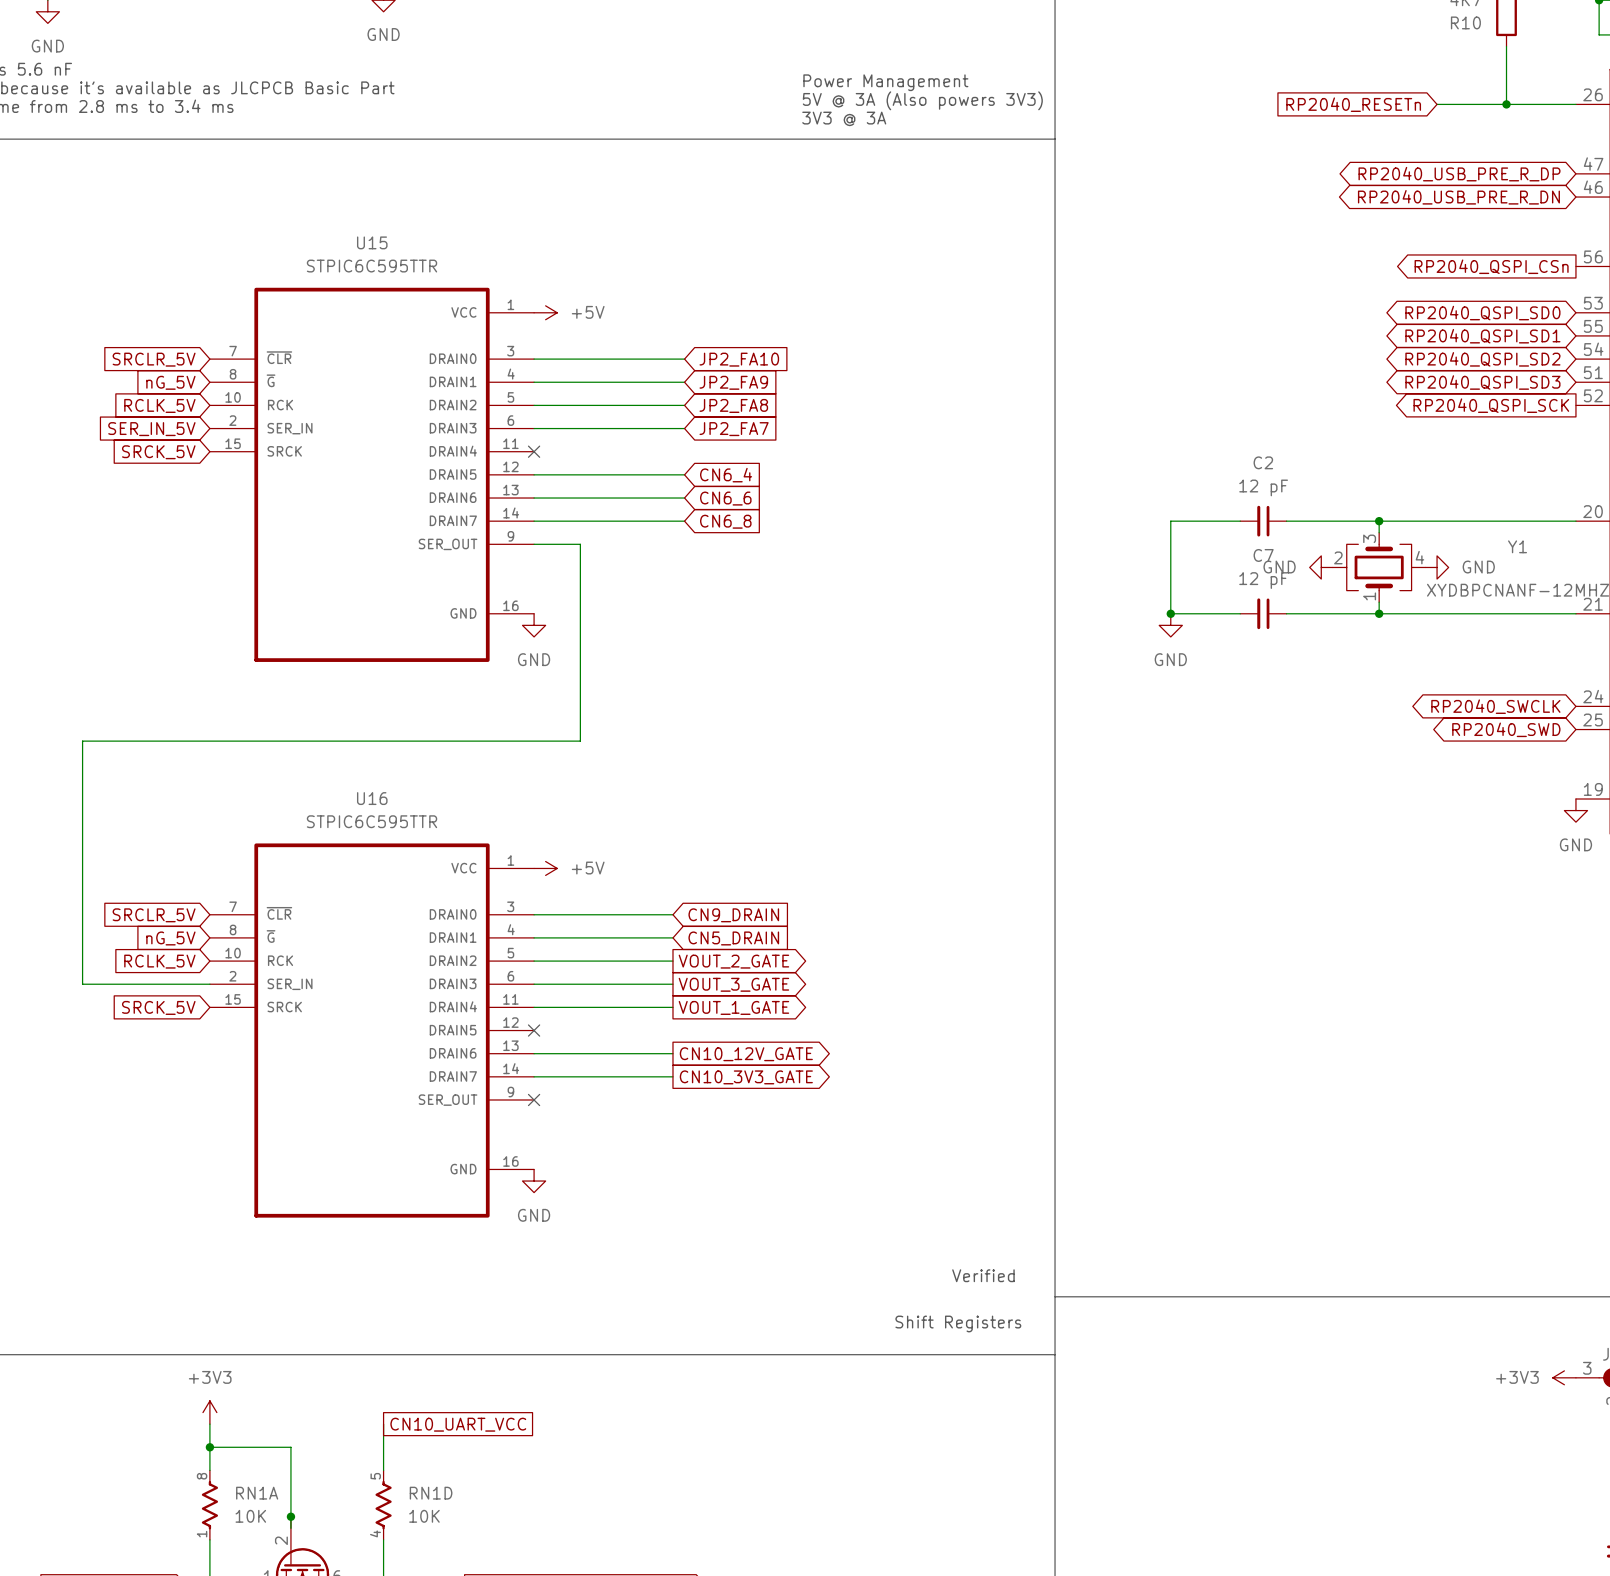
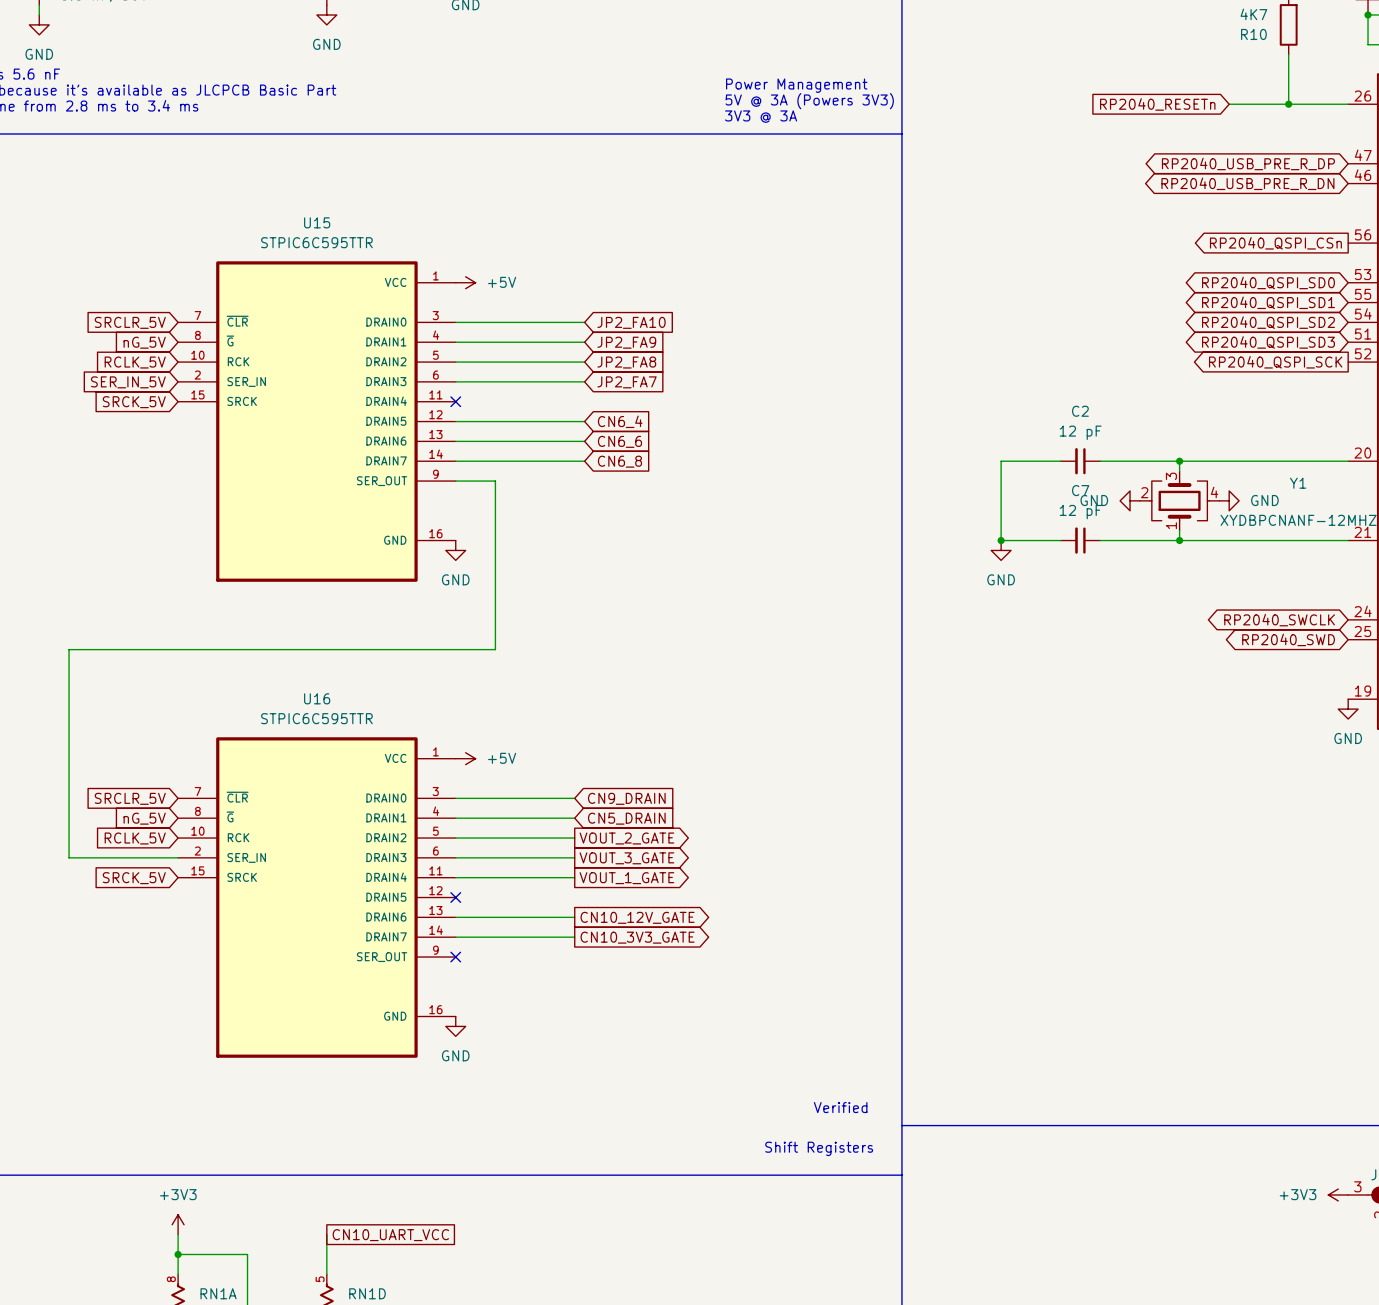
text position: Power Management (885, 82) -> Power Management (796, 85)
text: 5V @ 3A (Also powers 3V3) (922, 100) -> 5V @ 3A (Powers 3V3) (809, 101)
text position: 3V3 @ 3A (844, 118) -> 3V3 @ 3A (761, 116)

